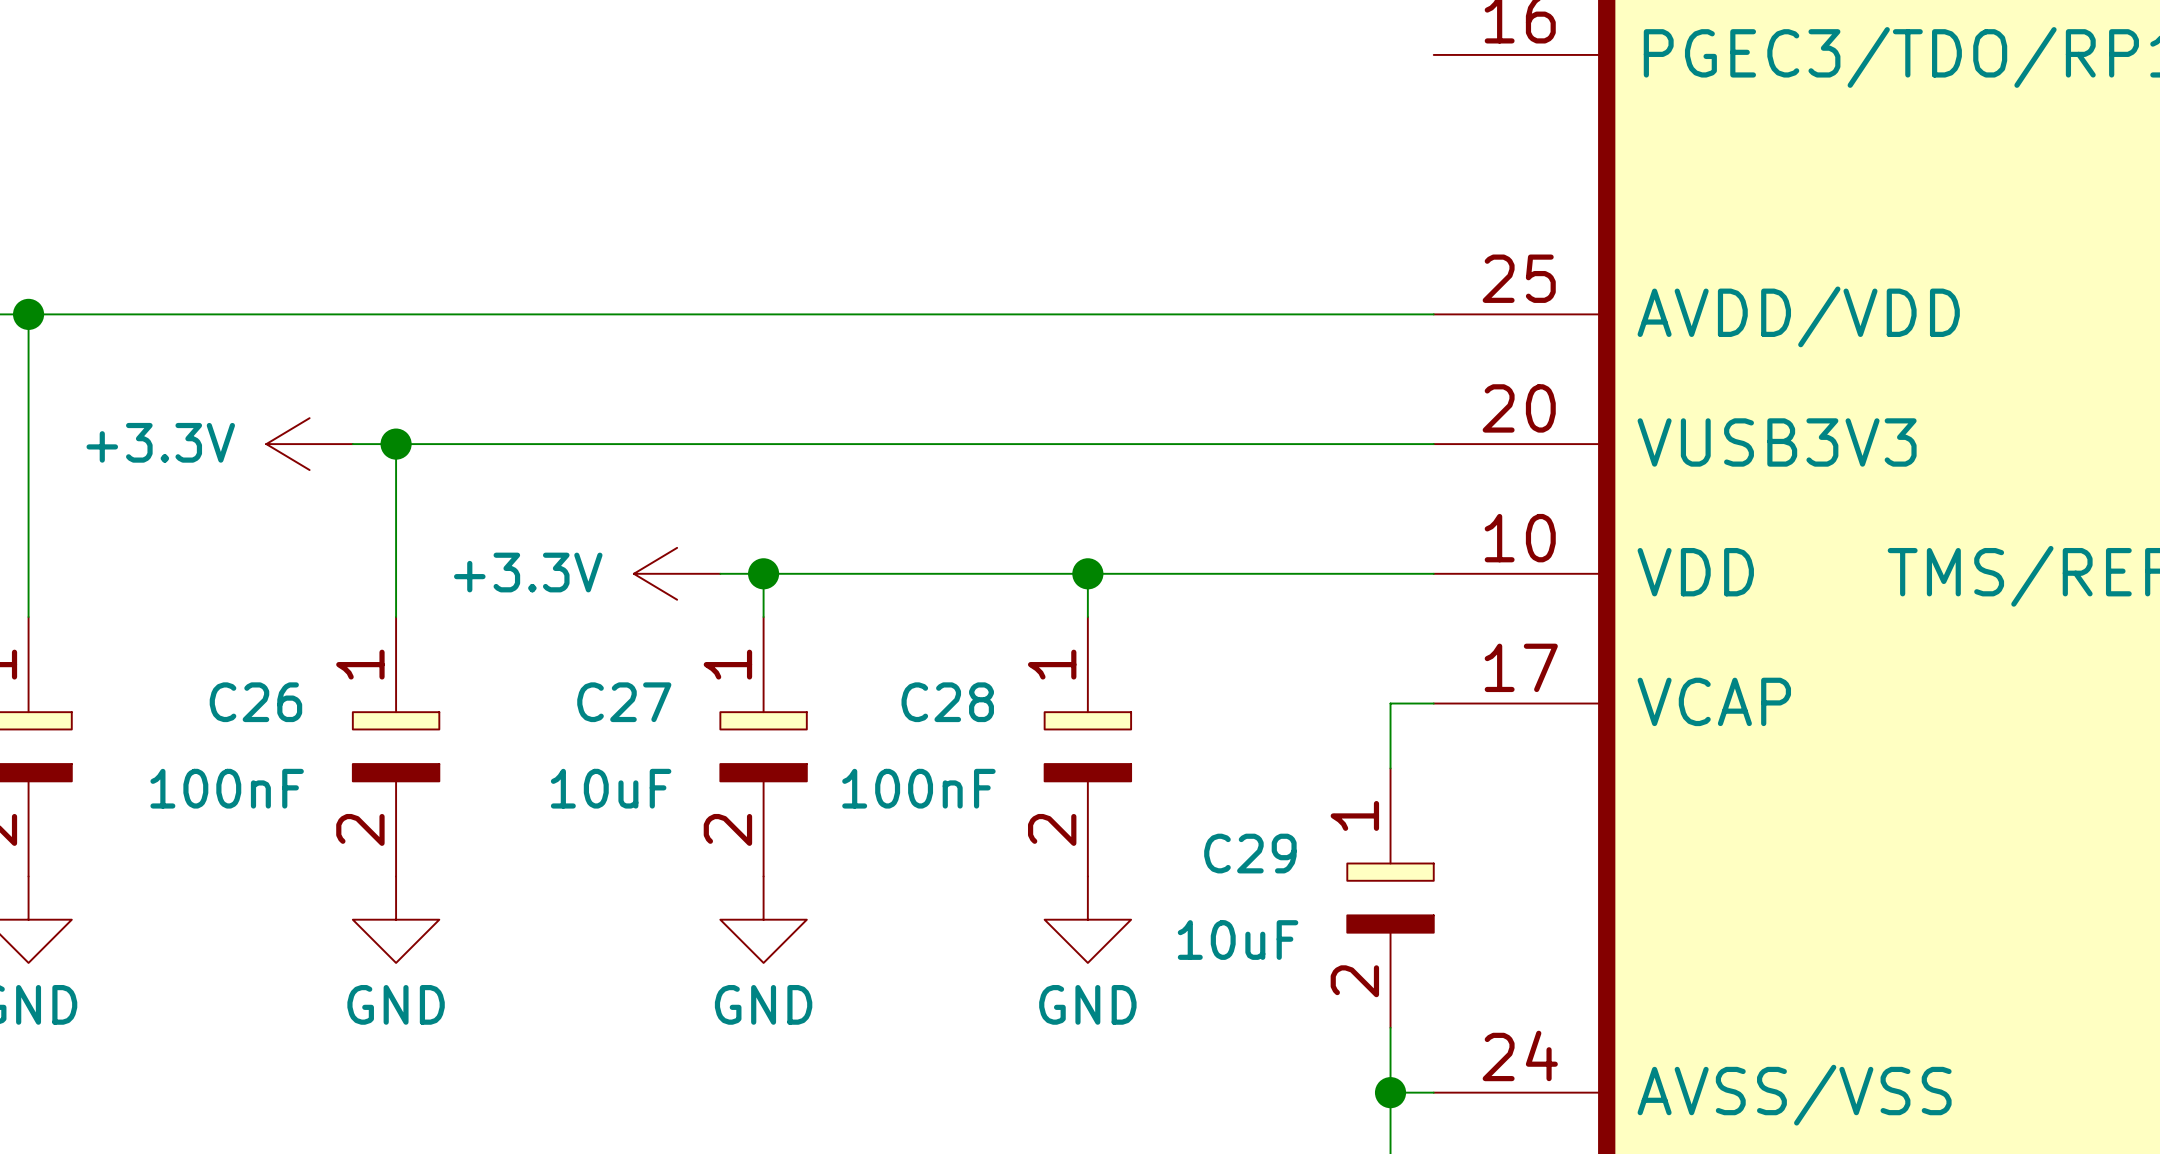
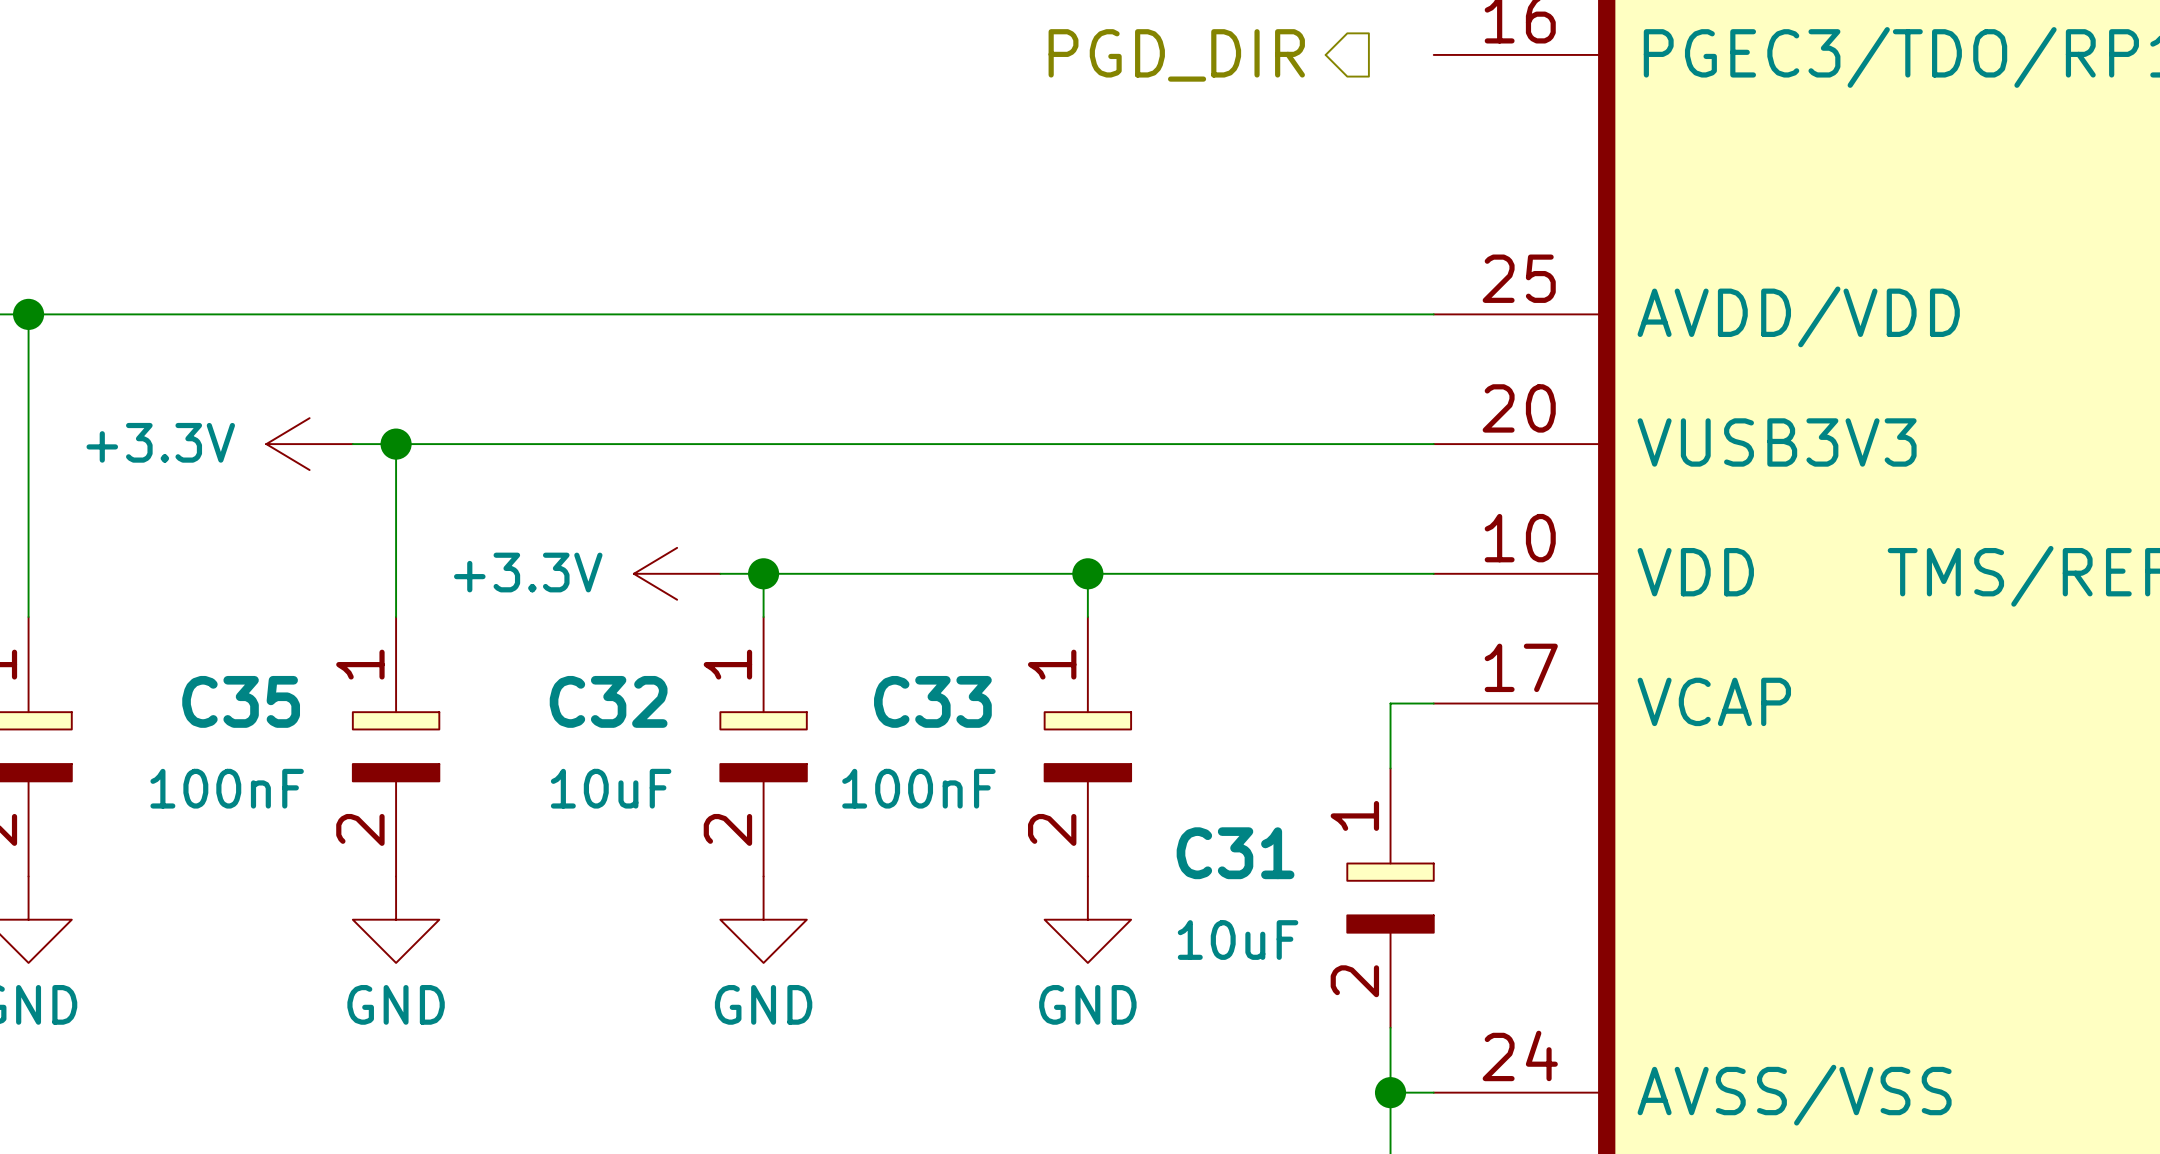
hierarchical label: none -> PGD_DIR (1176, 55)
C26 name: C26 (255, 702) -> C35 (241, 701)
C27 name: C27 (624, 702) -> C32 (608, 701)
C28 name: C28 (947, 702) -> C33 (932, 701)
C29 name: C29 (1250, 853) -> C31 (1235, 853)

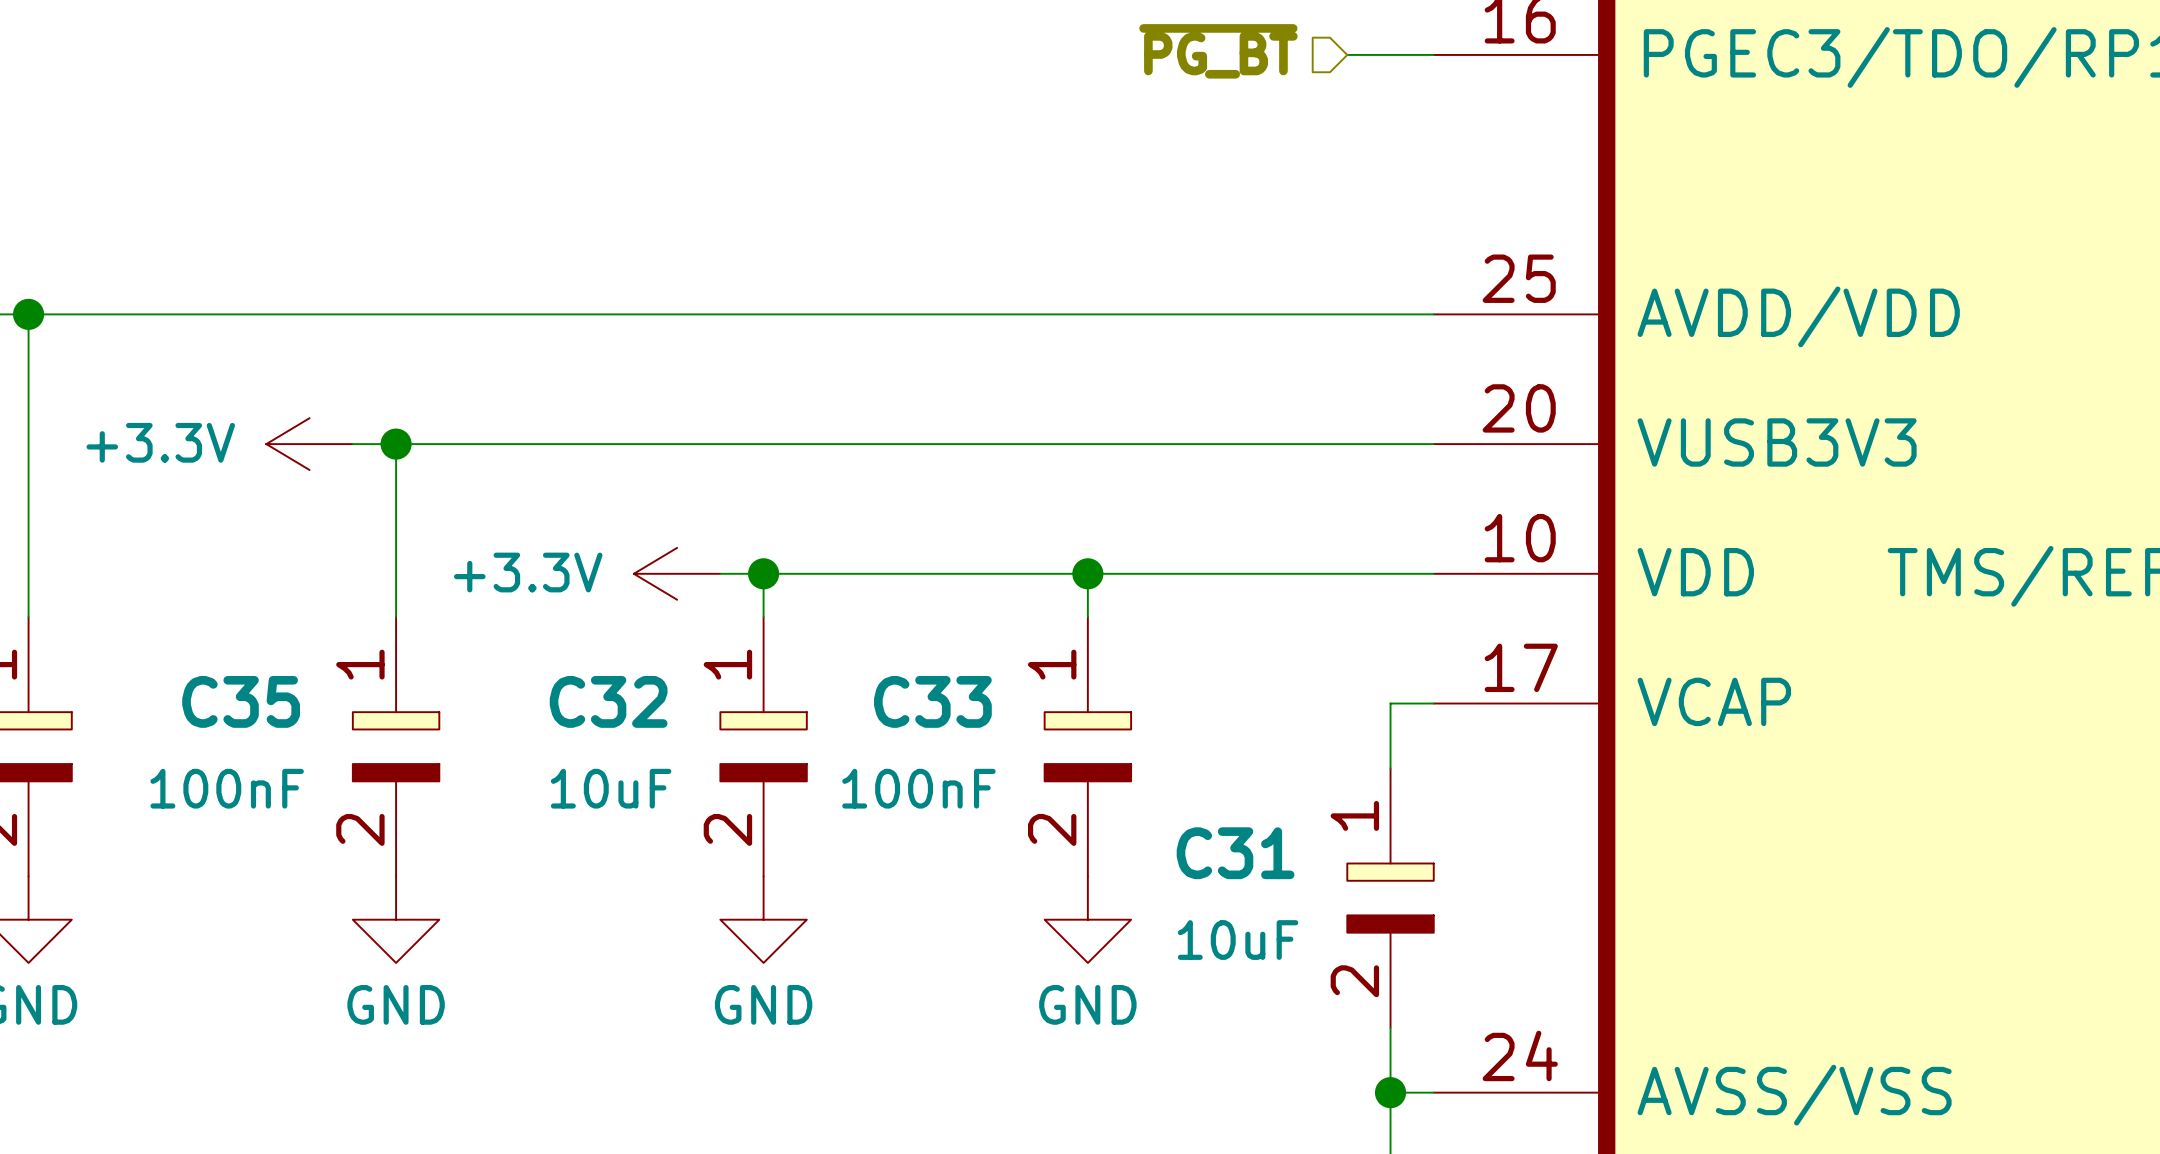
wire: none -> (1347, 54) (1433, 54)
hierarchical label shape: output (1176, 55) -> input (1218, 51)
hierarchical label: PGD_DIR (1176, 55) -> ~{PG_BT} (1218, 51)

